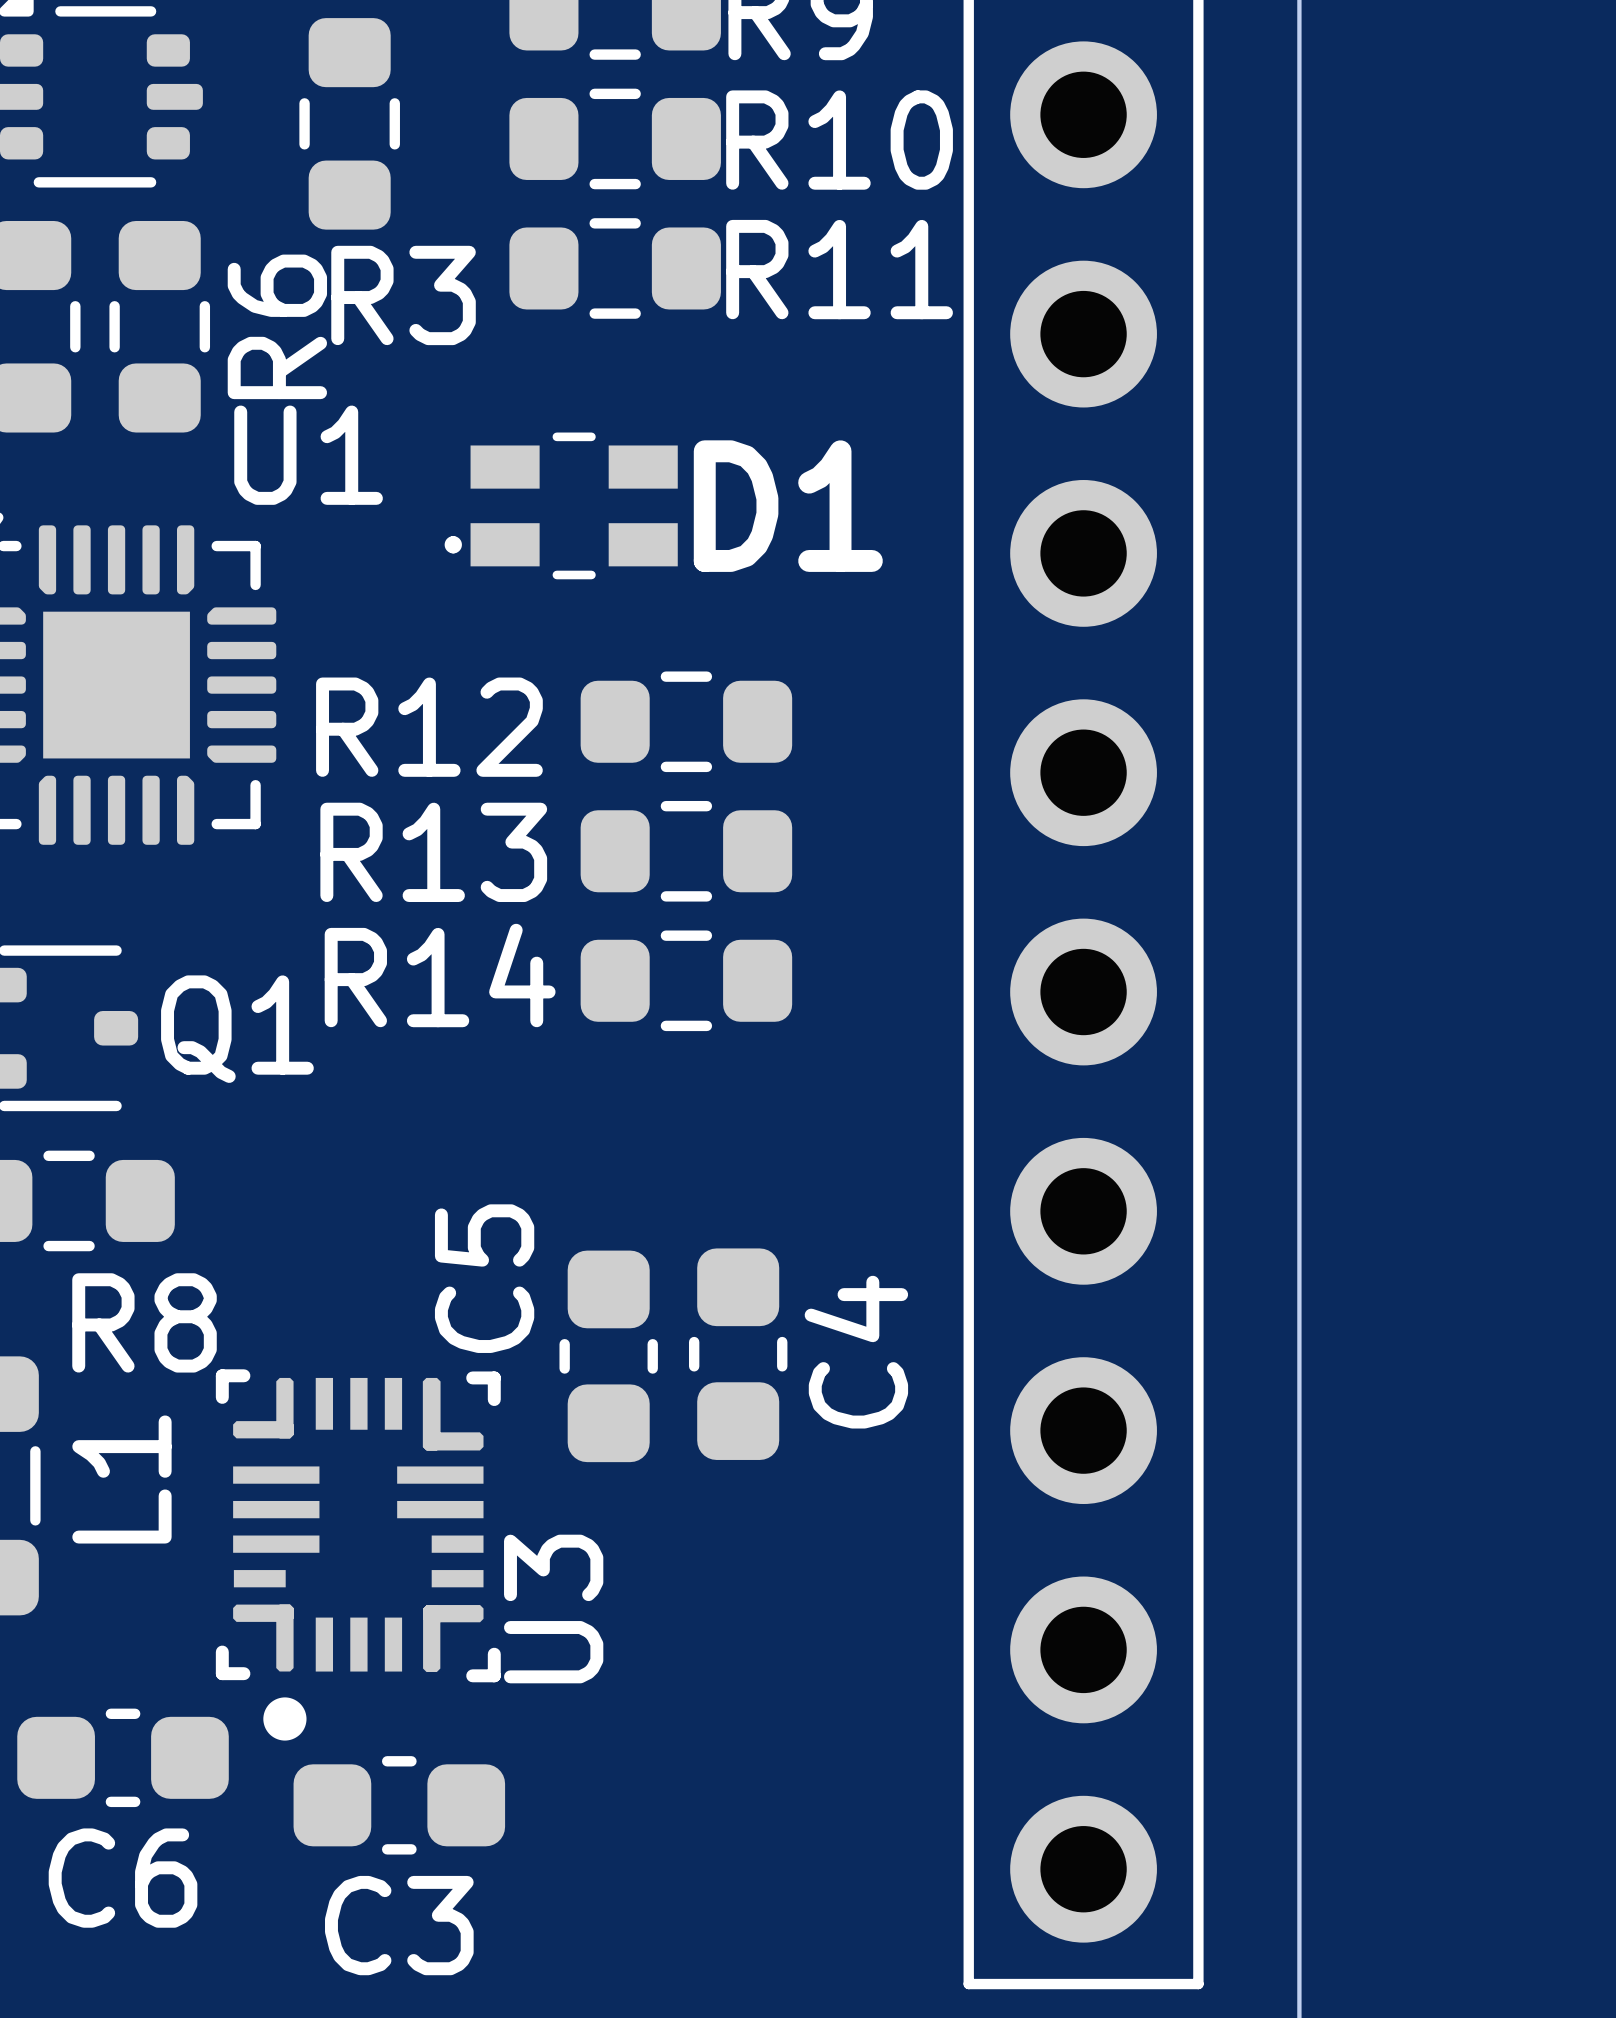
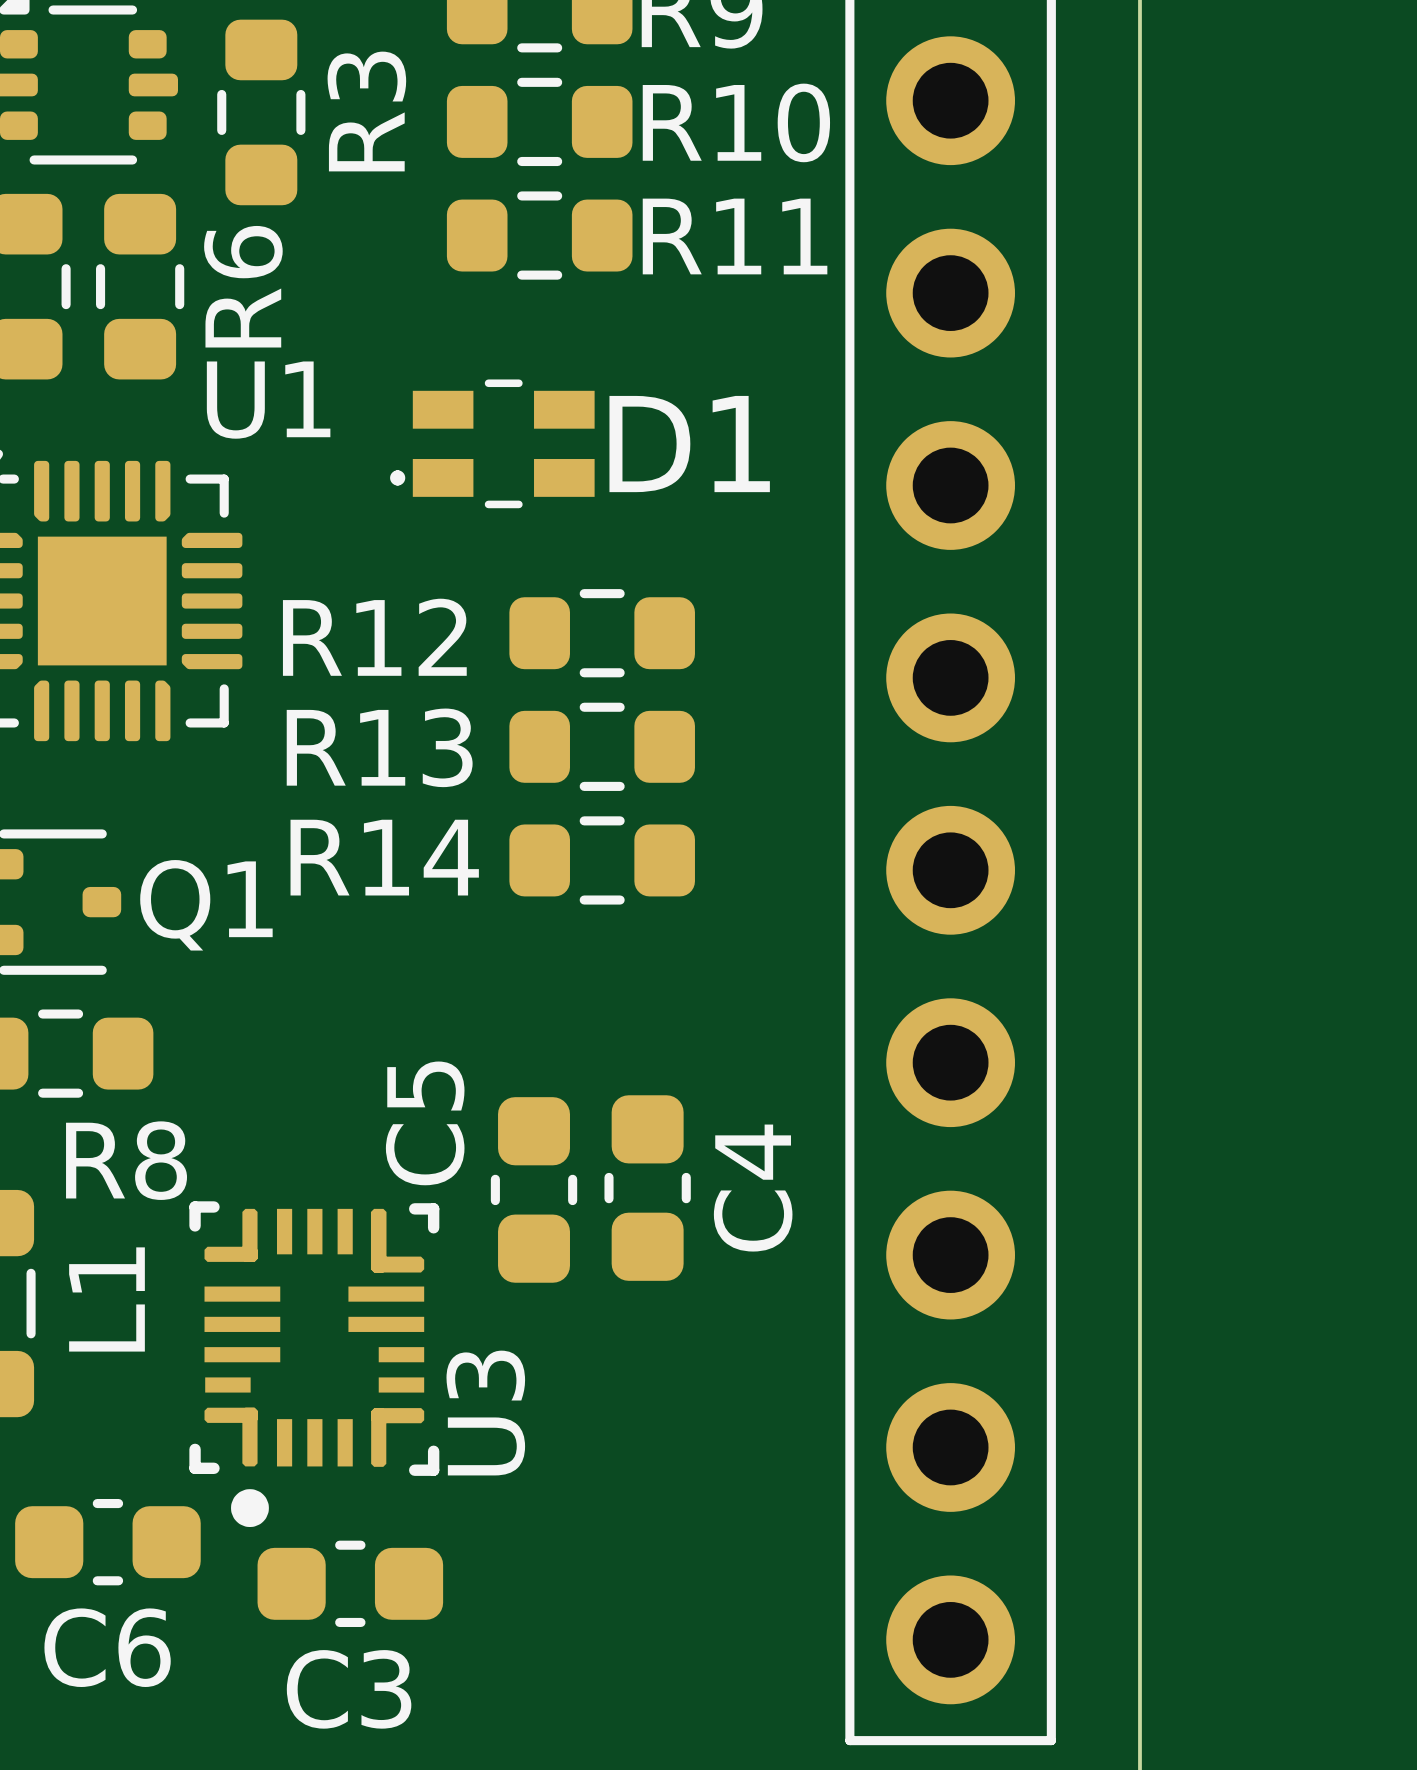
R3 position: (349, 123) -> (261, 112)
R3 name rotation: 0° (403, 295) -> 90° counterclockwise (366, 111)

